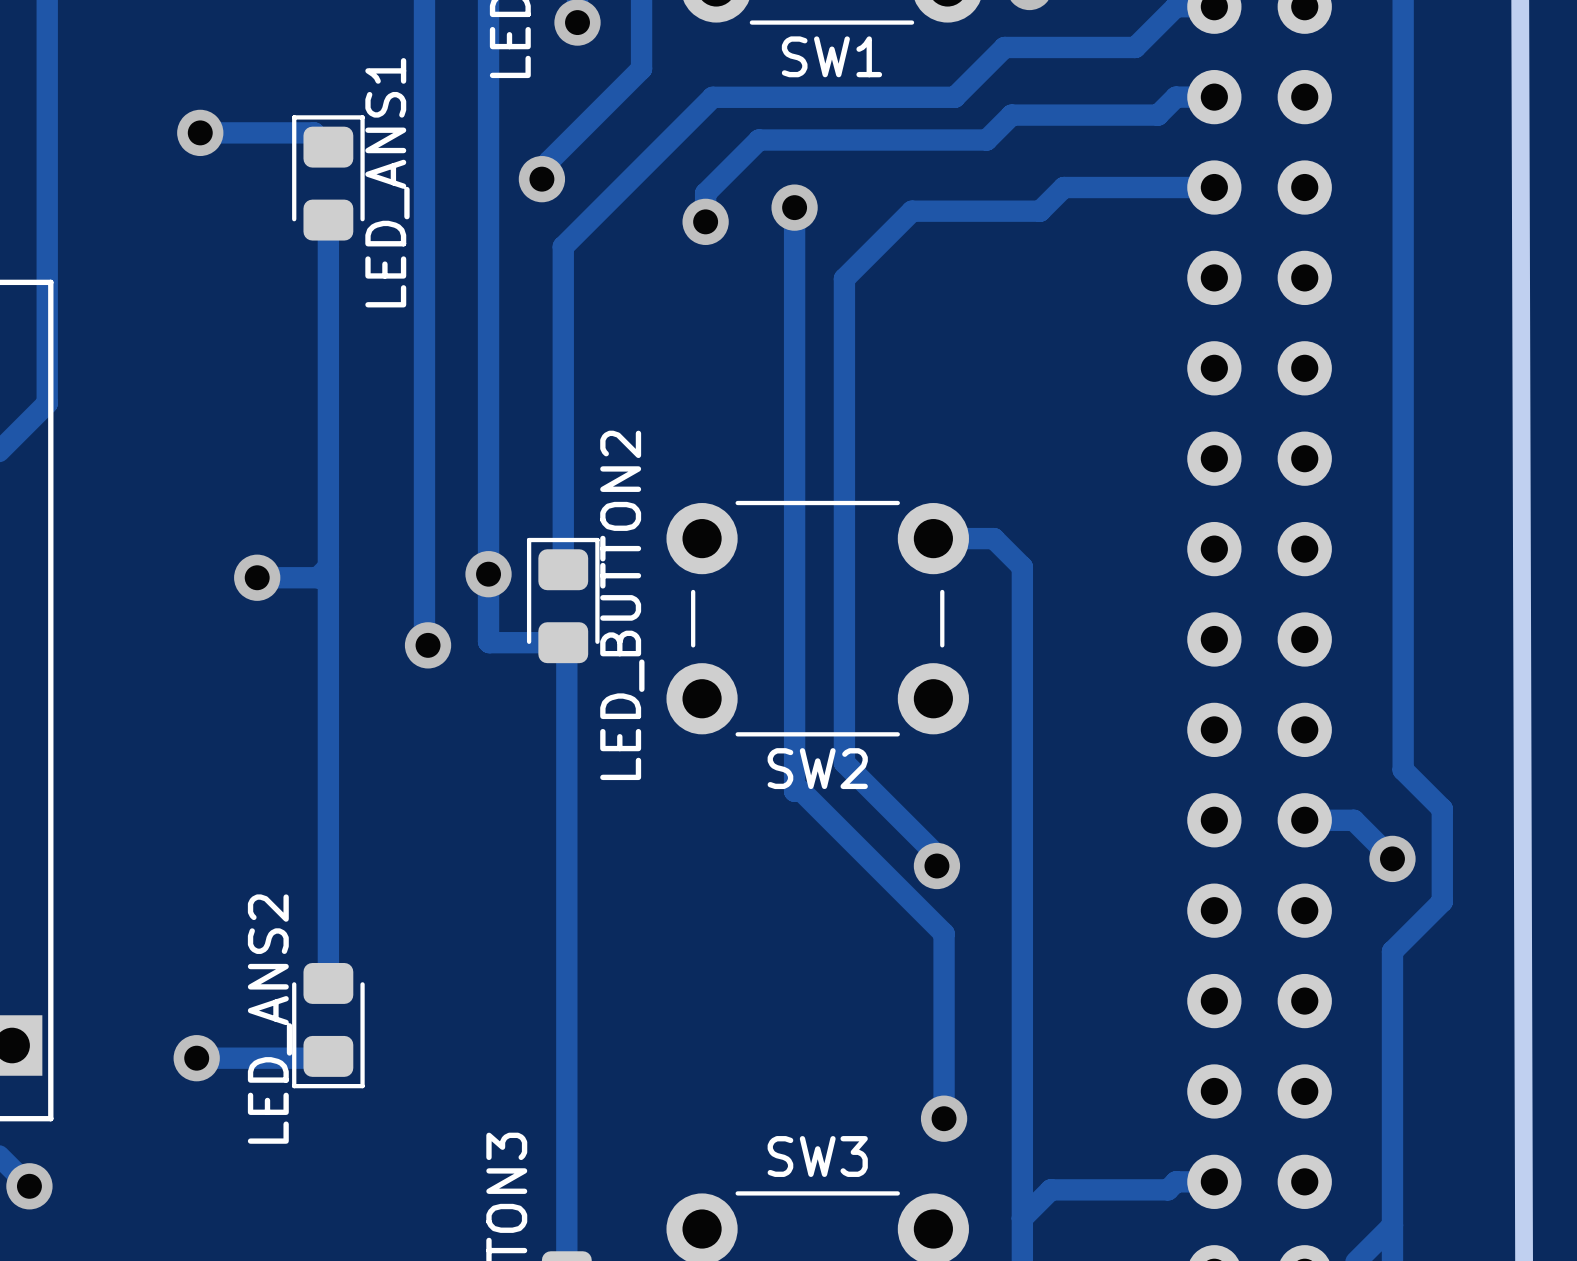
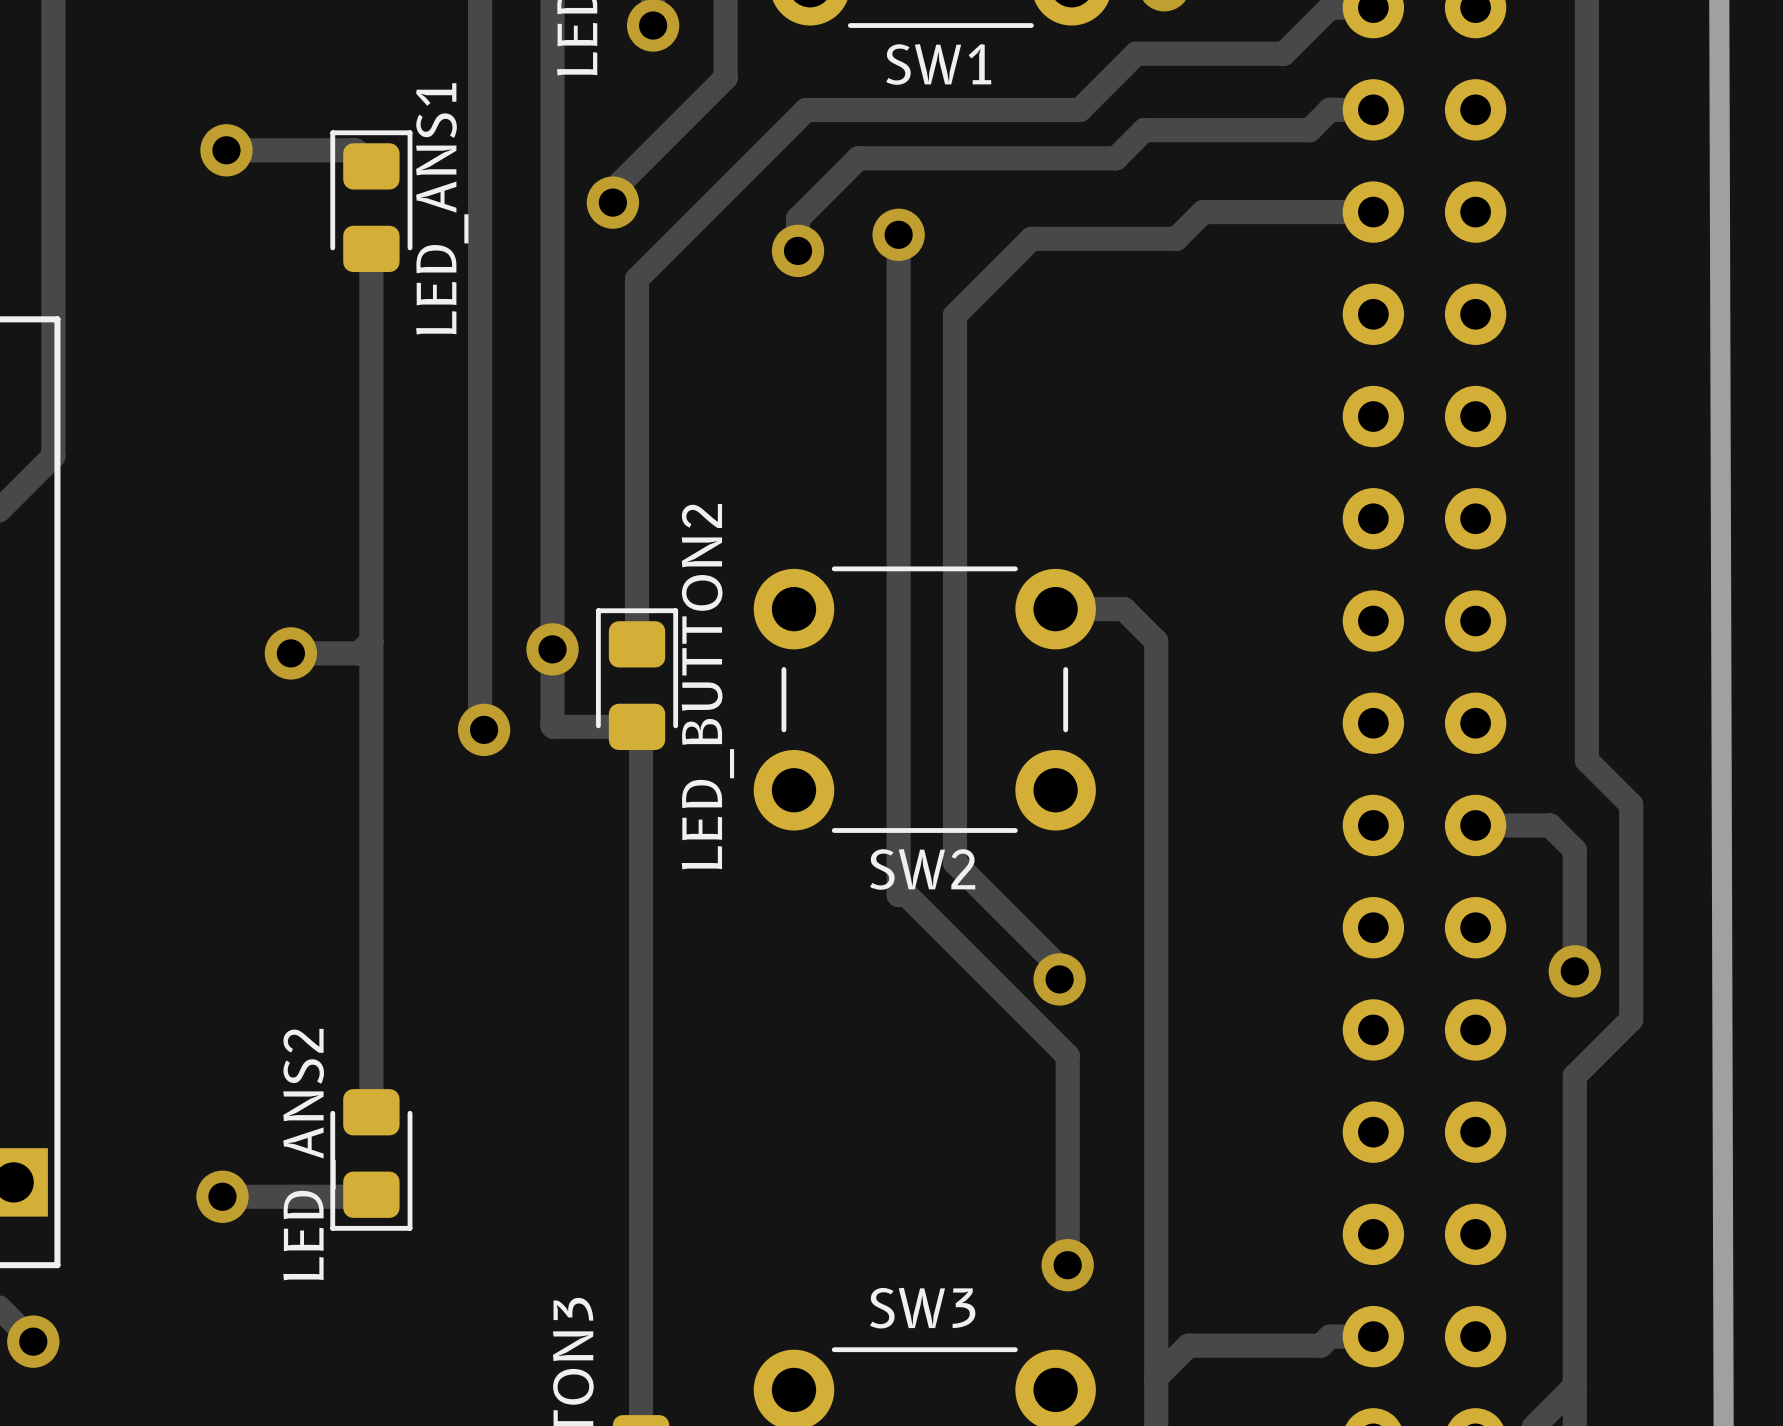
track: (1403, 672) (1403, 769) (1442, 809) -> (1586, 760) (1631, 804) (1631, 915)
track: (1304, 820) (1353, 820) (1392, 858) -> (1475, 825) (1550, 825) (1574, 850) (1574, 971)

